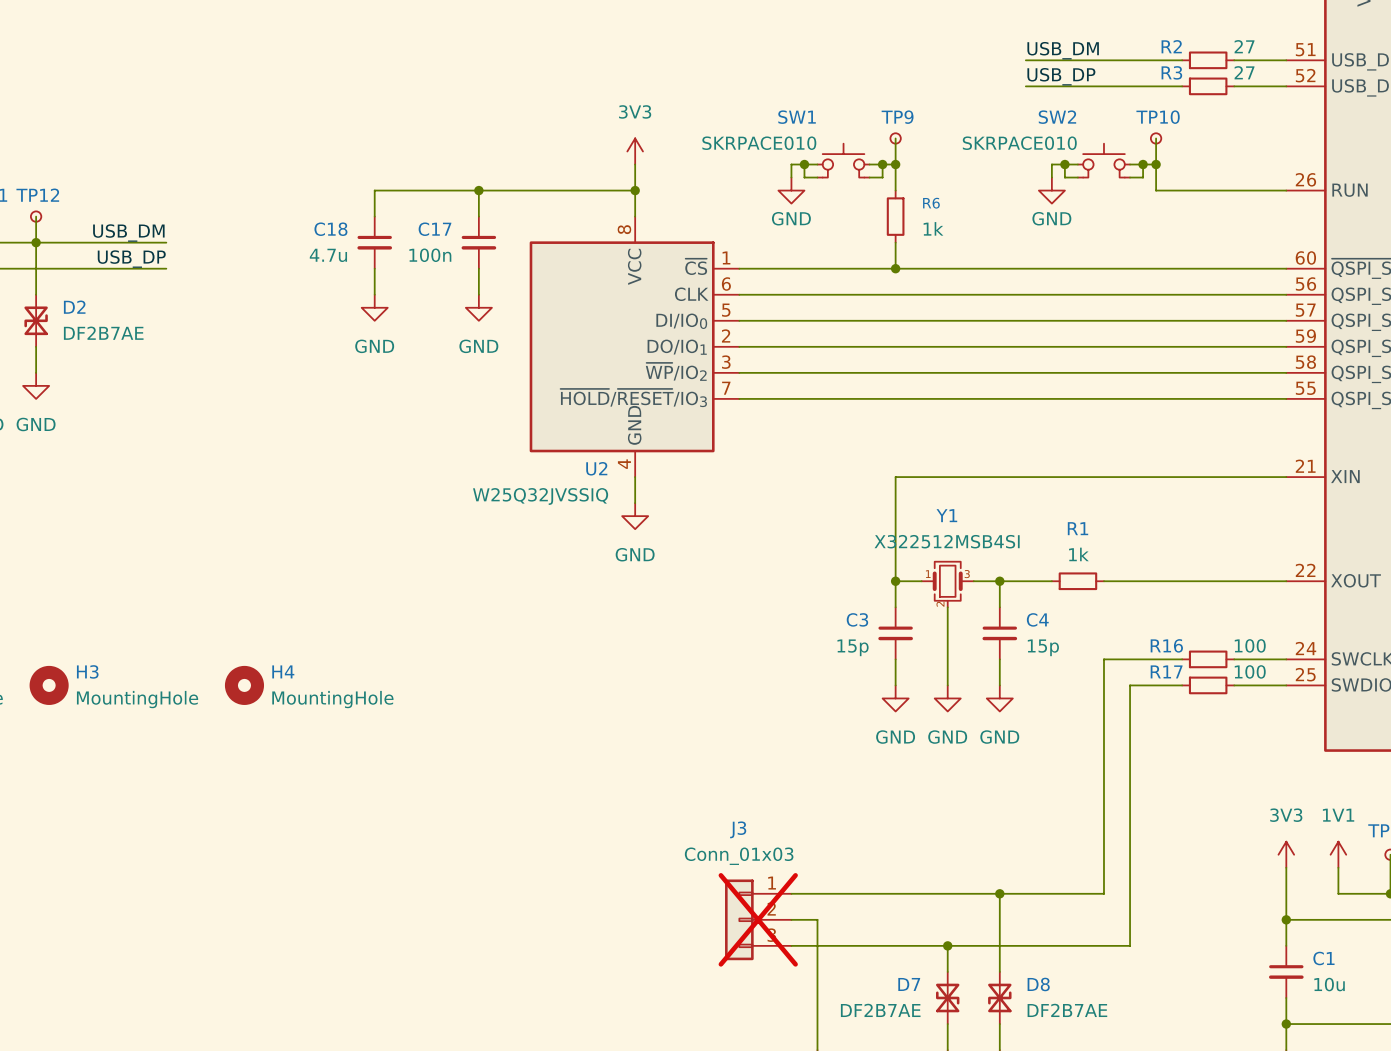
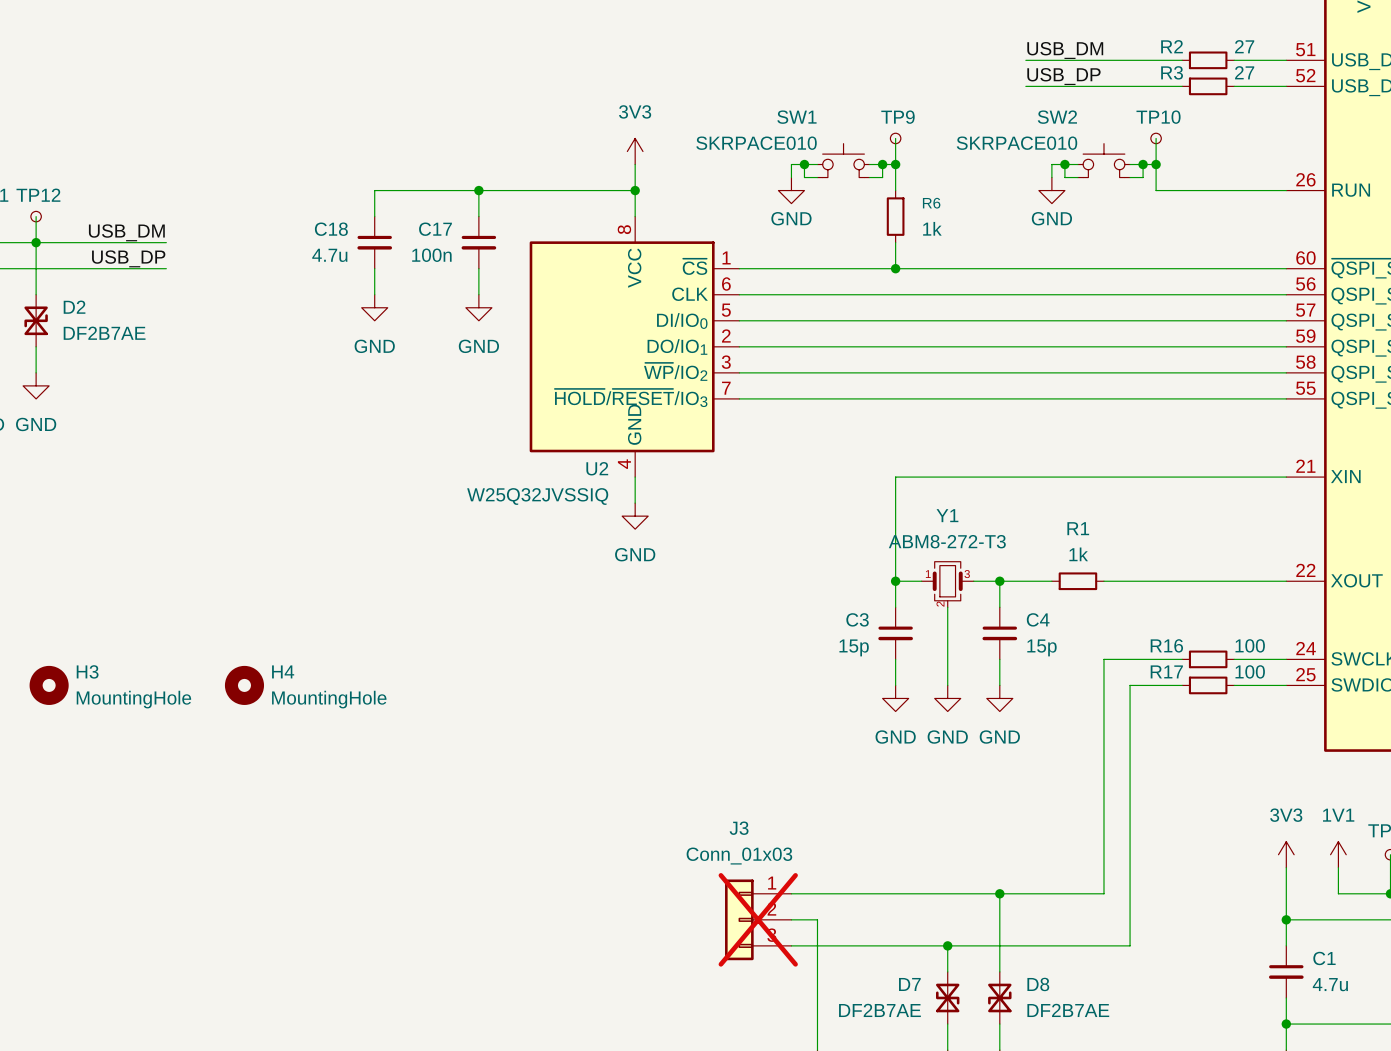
Y1 value: X322512MSB4SI (947, 541) -> ABM8-272-T3 (947, 541)
C1 value: 10u (1329, 984) -> 4.7u (1330, 984)

